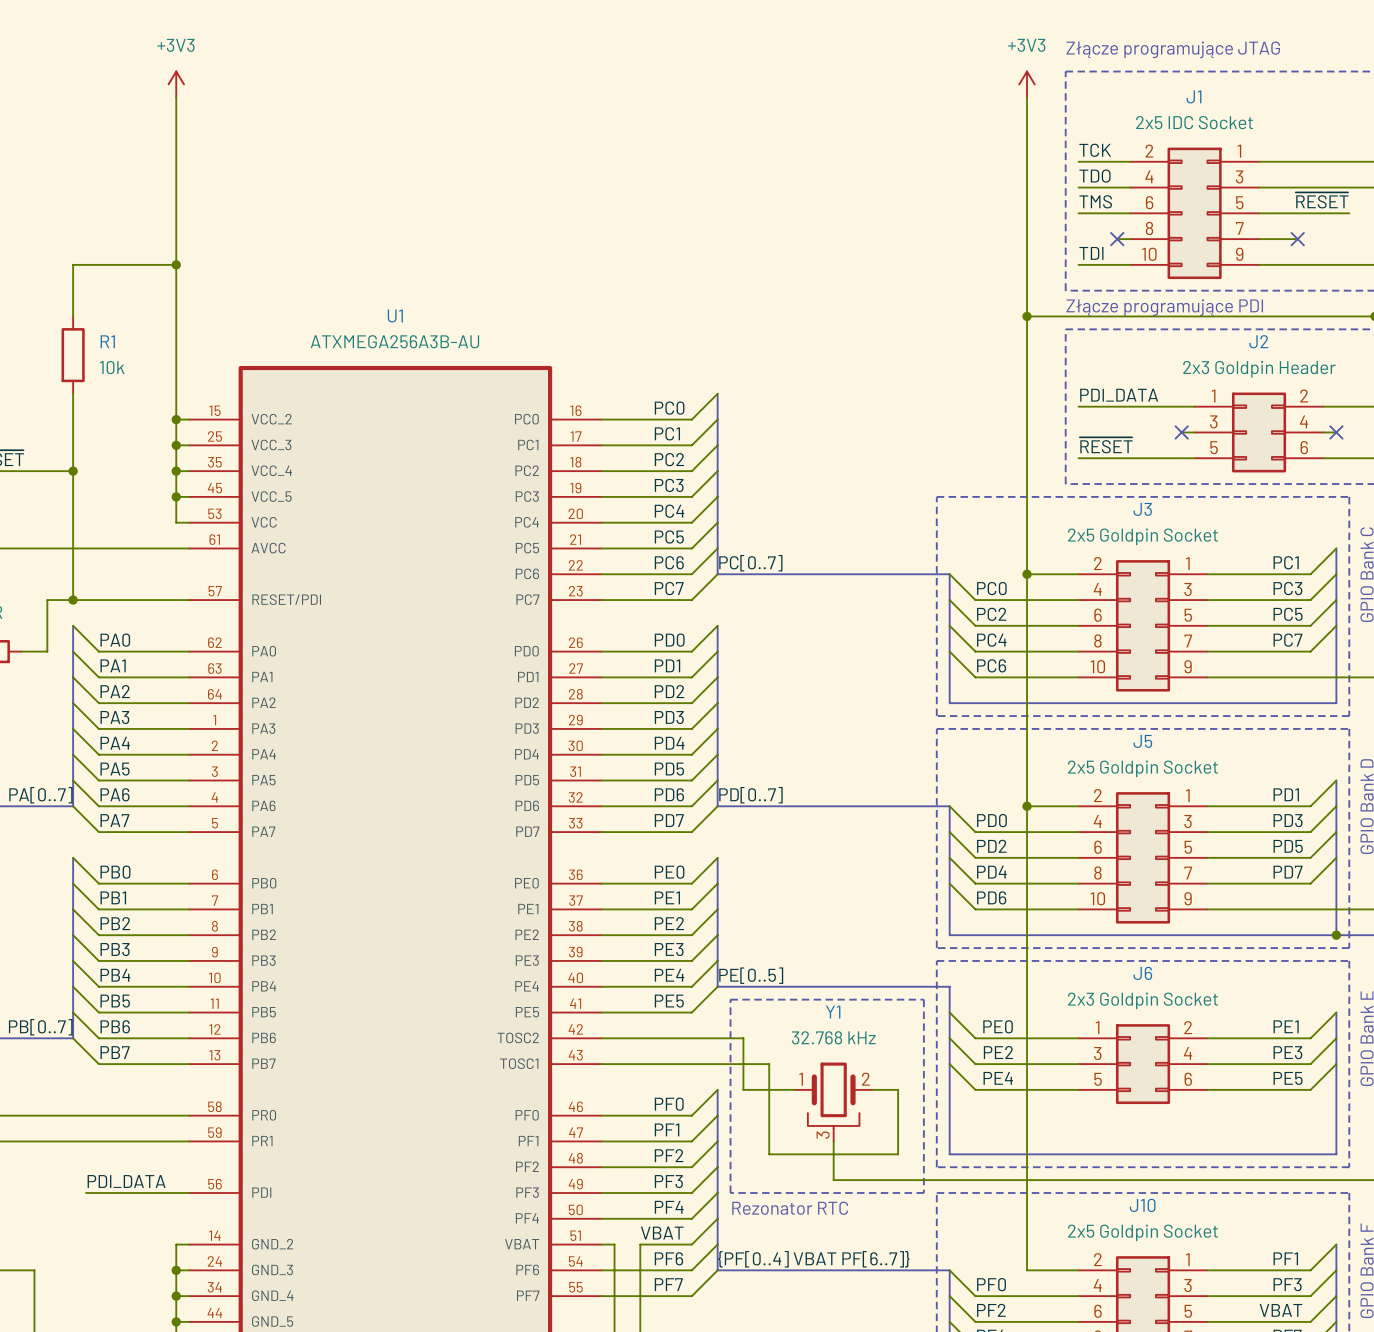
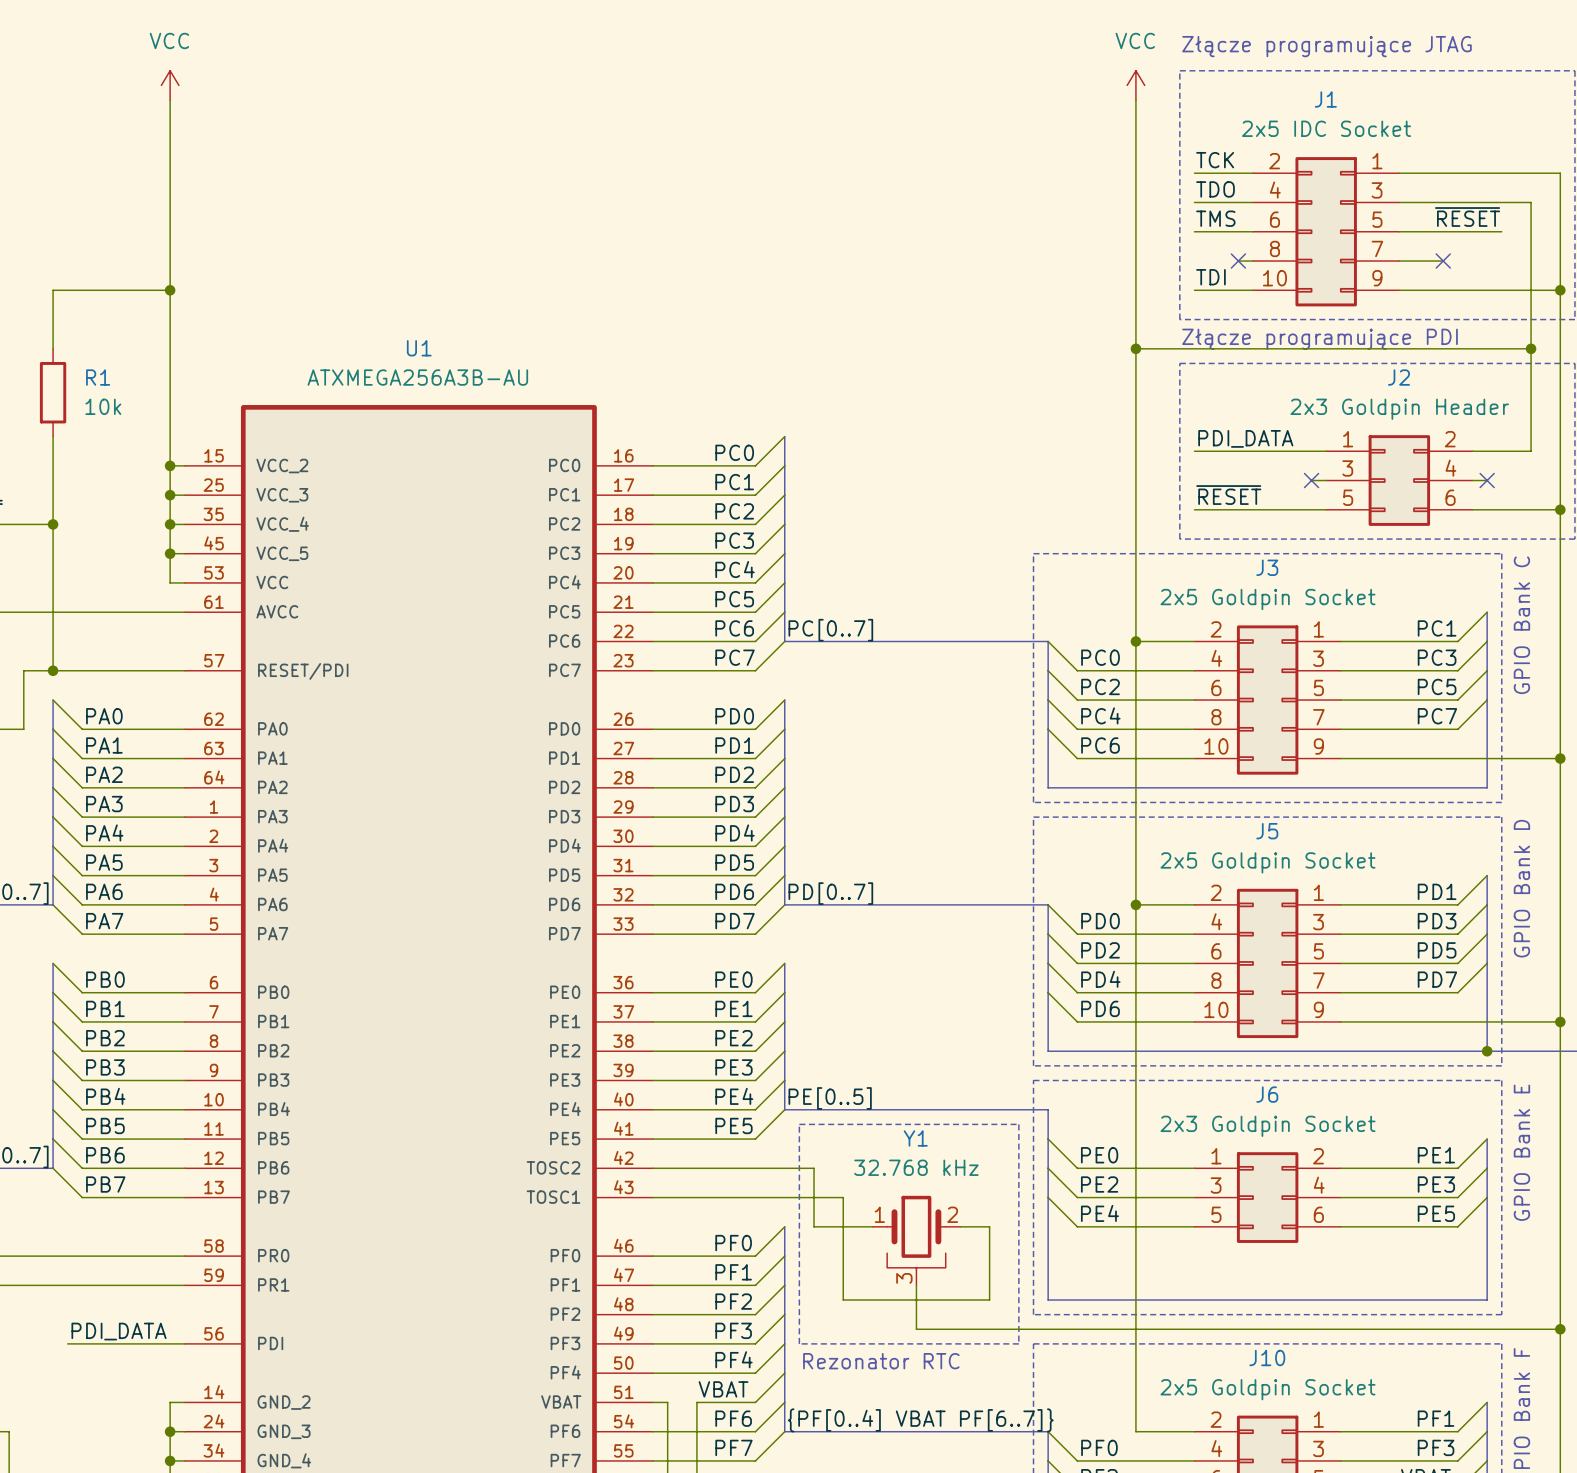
power symbol: +3V3 (176, 84) -> VCC (170, 85)
power symbol: +3V3 (1027, 84) -> VCC (1135, 85)

